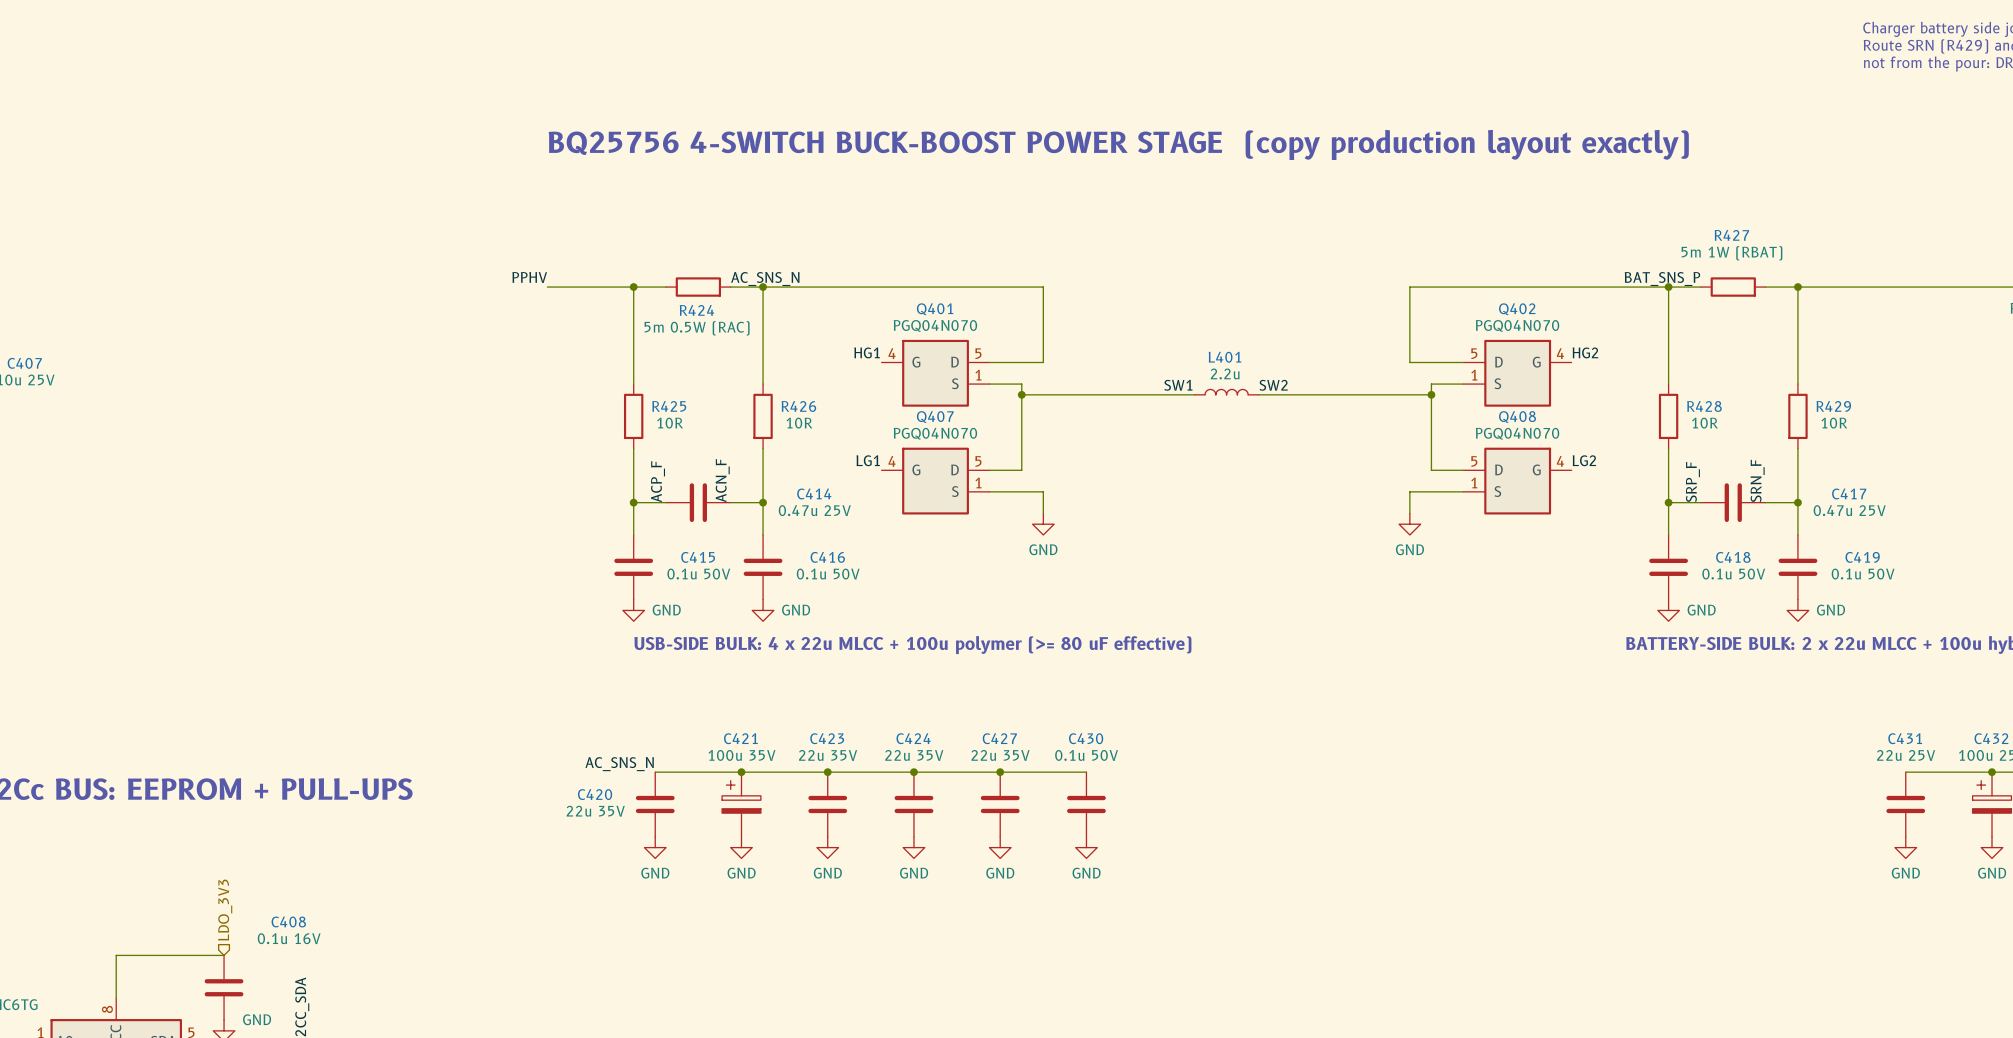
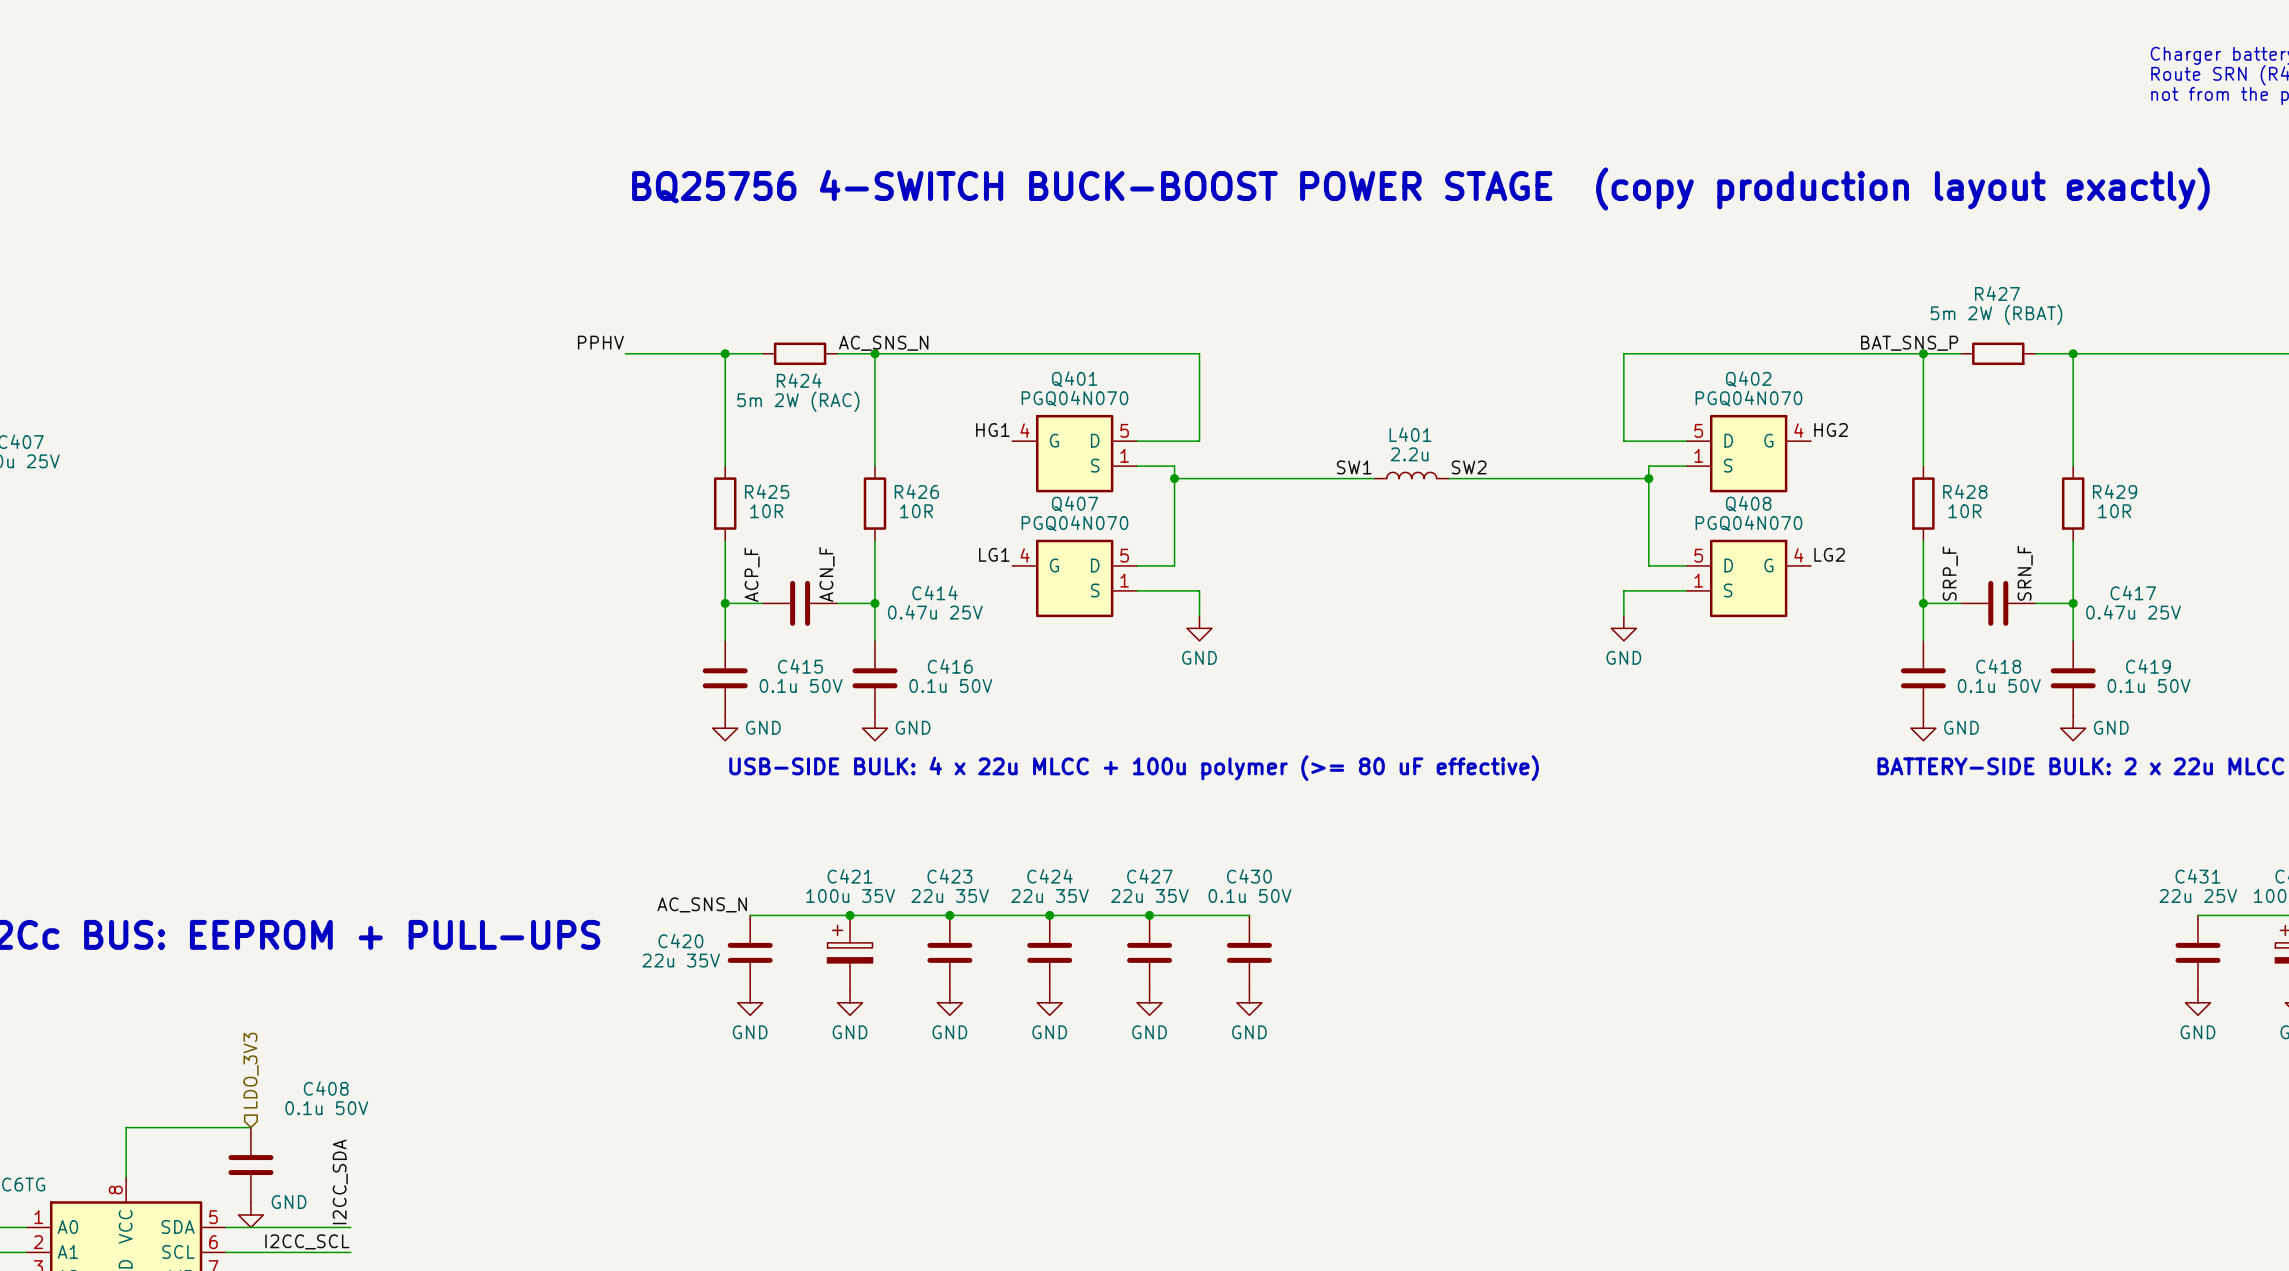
R427 value: 5m 1W (RBAT) (1732, 253) -> 5m 2W (RBAT) (1996, 314)
R424 value: 5m 0.5W (RAC) (697, 328) -> 5m 2W (RAC) (798, 401)
C408 value: 0.1u 16V (289, 938) -> 0.1u 50V (326, 1108)

